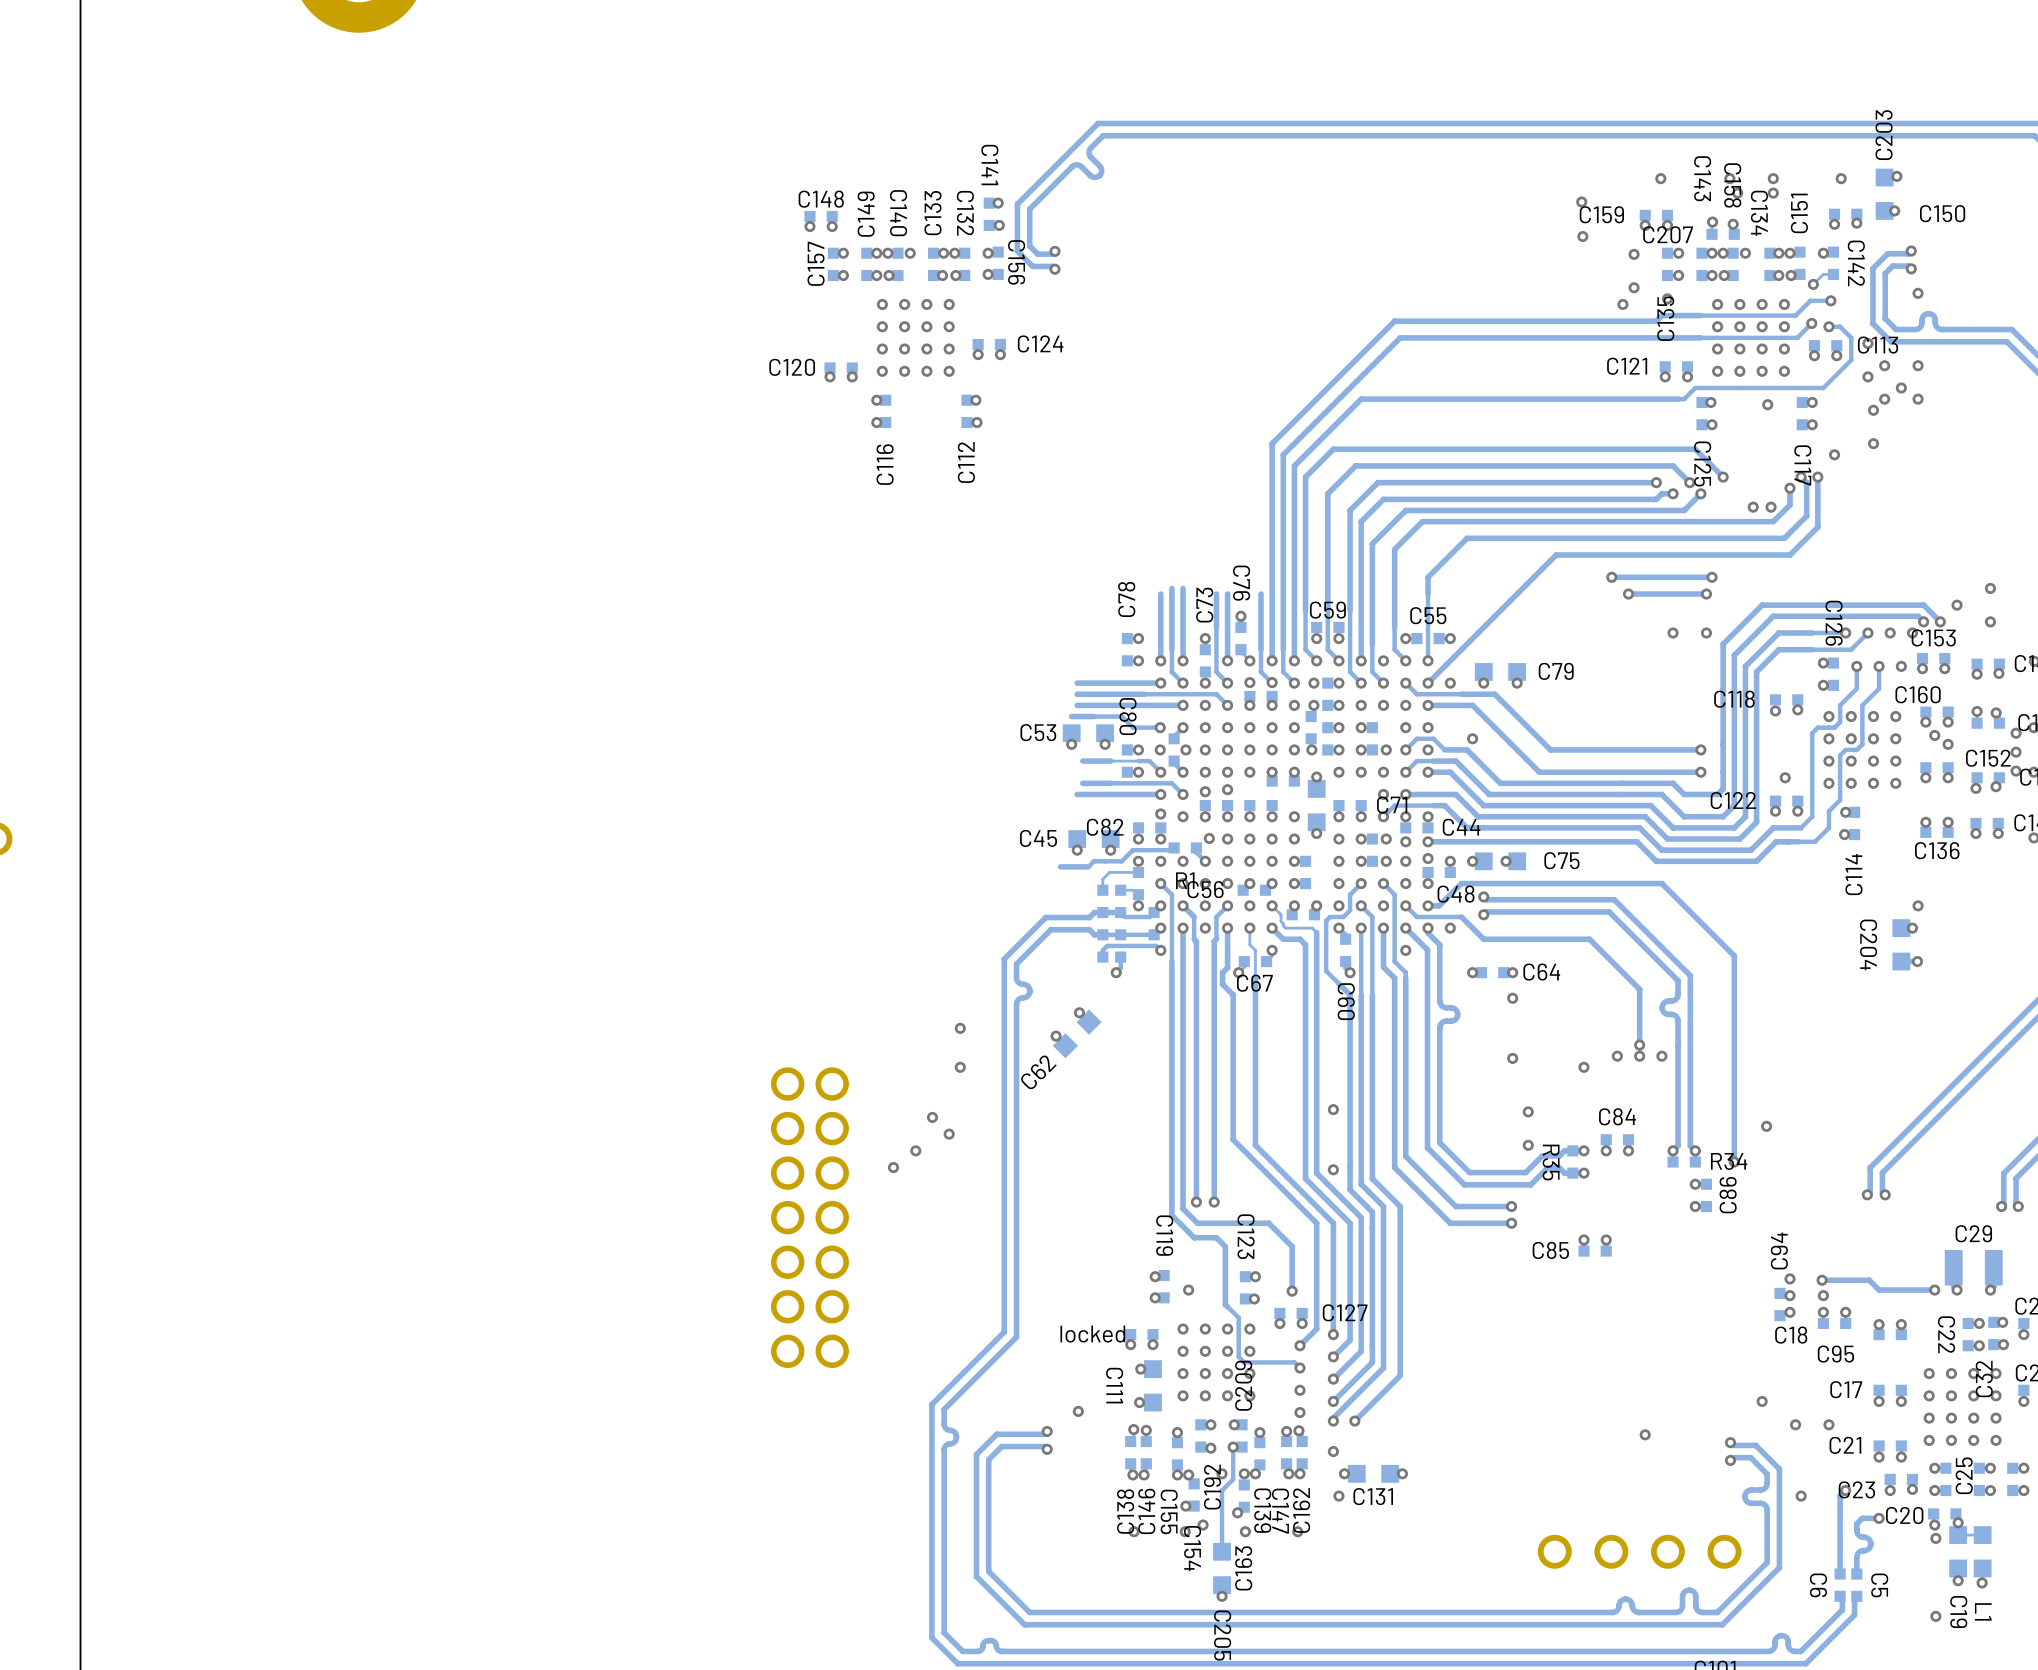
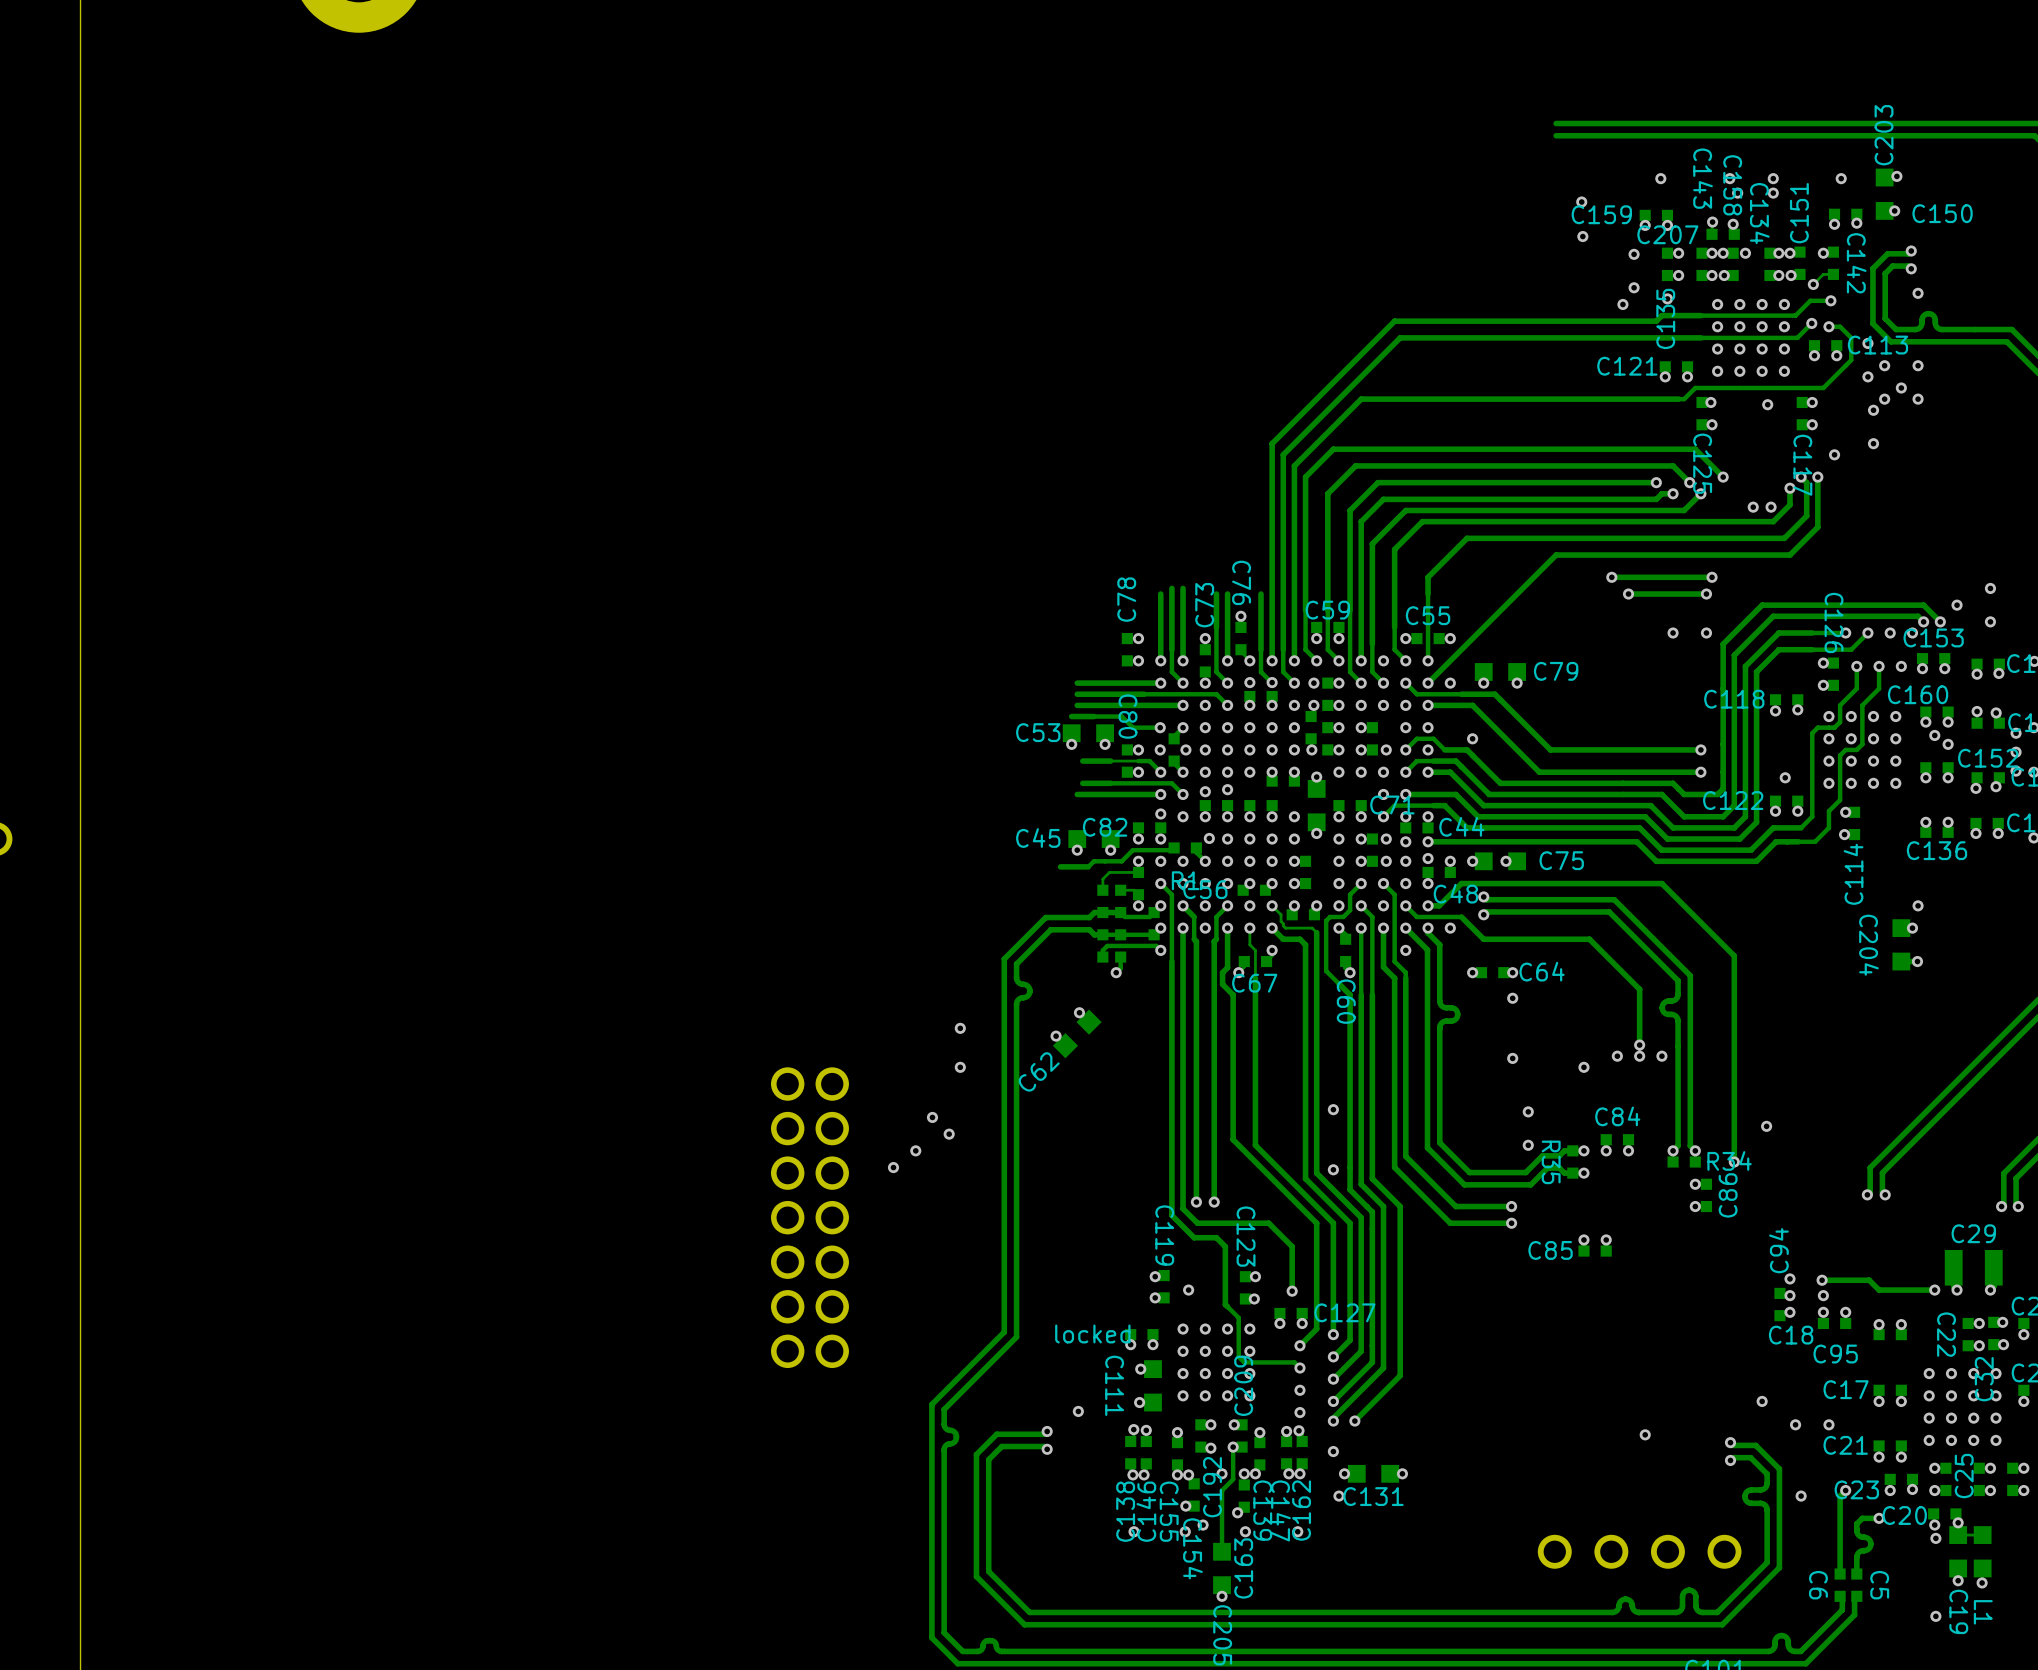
track: (1556, 123) (1098, 123) (1017, 204) (1017, 251) (1032, 266) (1052, 266) (1054, 269) -> none
track: (1556, 135) (1103, 135) (1089, 151) (1090, 156) (1101, 167) (1099, 175) (1092, 177) (1080, 165) (1073, 165) (1029, 209) (1029, 246) (1037, 254) (1052, 254) (1054, 251) -> none
via: (998, 203) -> none
C141: (989, 214) -> none
C148: (821, 216) -> none
via: (999, 225) -> none
via: (809, 226) -> none
via: (832, 226) -> none
via: (1054, 251) -> none
via: (843, 253) -> none
via: (876, 253) -> none
via: (887, 253) -> none
via: (910, 253) -> none
via: (943, 253) -> none
via: (954, 253) -> none
via: (988, 253) -> none
C156: (998, 263) -> none
C157: (833, 264) -> none
C149: (866, 264) -> none
C140: (897, 264) -> none
C133: (933, 264) -> none
C132: (964, 264) -> none
via: (1054, 269) -> none
via: (988, 274) -> none
via: (843, 275) -> none
via: (876, 275) -> none
via: (889, 275) -> none
via: (942, 275) -> none
via: (955, 275) -> none
via: (882, 304) -> none
via: (904, 304) -> none
via: (926, 304) -> none
via: (949, 304) -> none
via: (882, 326) -> none
via: (904, 326) -> none
via: (926, 326) -> none
via: (949, 326) -> none
C124: (989, 344) -> none
via: (882, 349) -> none
via: (904, 349) -> none
via: (926, 349) -> none
via: (949, 349) -> none
via: (978, 354) -> none
via: (1000, 354) -> none
C120: (841, 367) -> none
via: (882, 371) -> none
via: (904, 371) -> none
via: (926, 371) -> none
via: (949, 371) -> none
via: (830, 376) -> none
via: (852, 376) -> none
via: (876, 400) -> none
via: (975, 400) -> none
C116: (885, 411) -> none
C112: (966, 411) -> none
via: (876, 422) -> none
via: (977, 422) -> none

